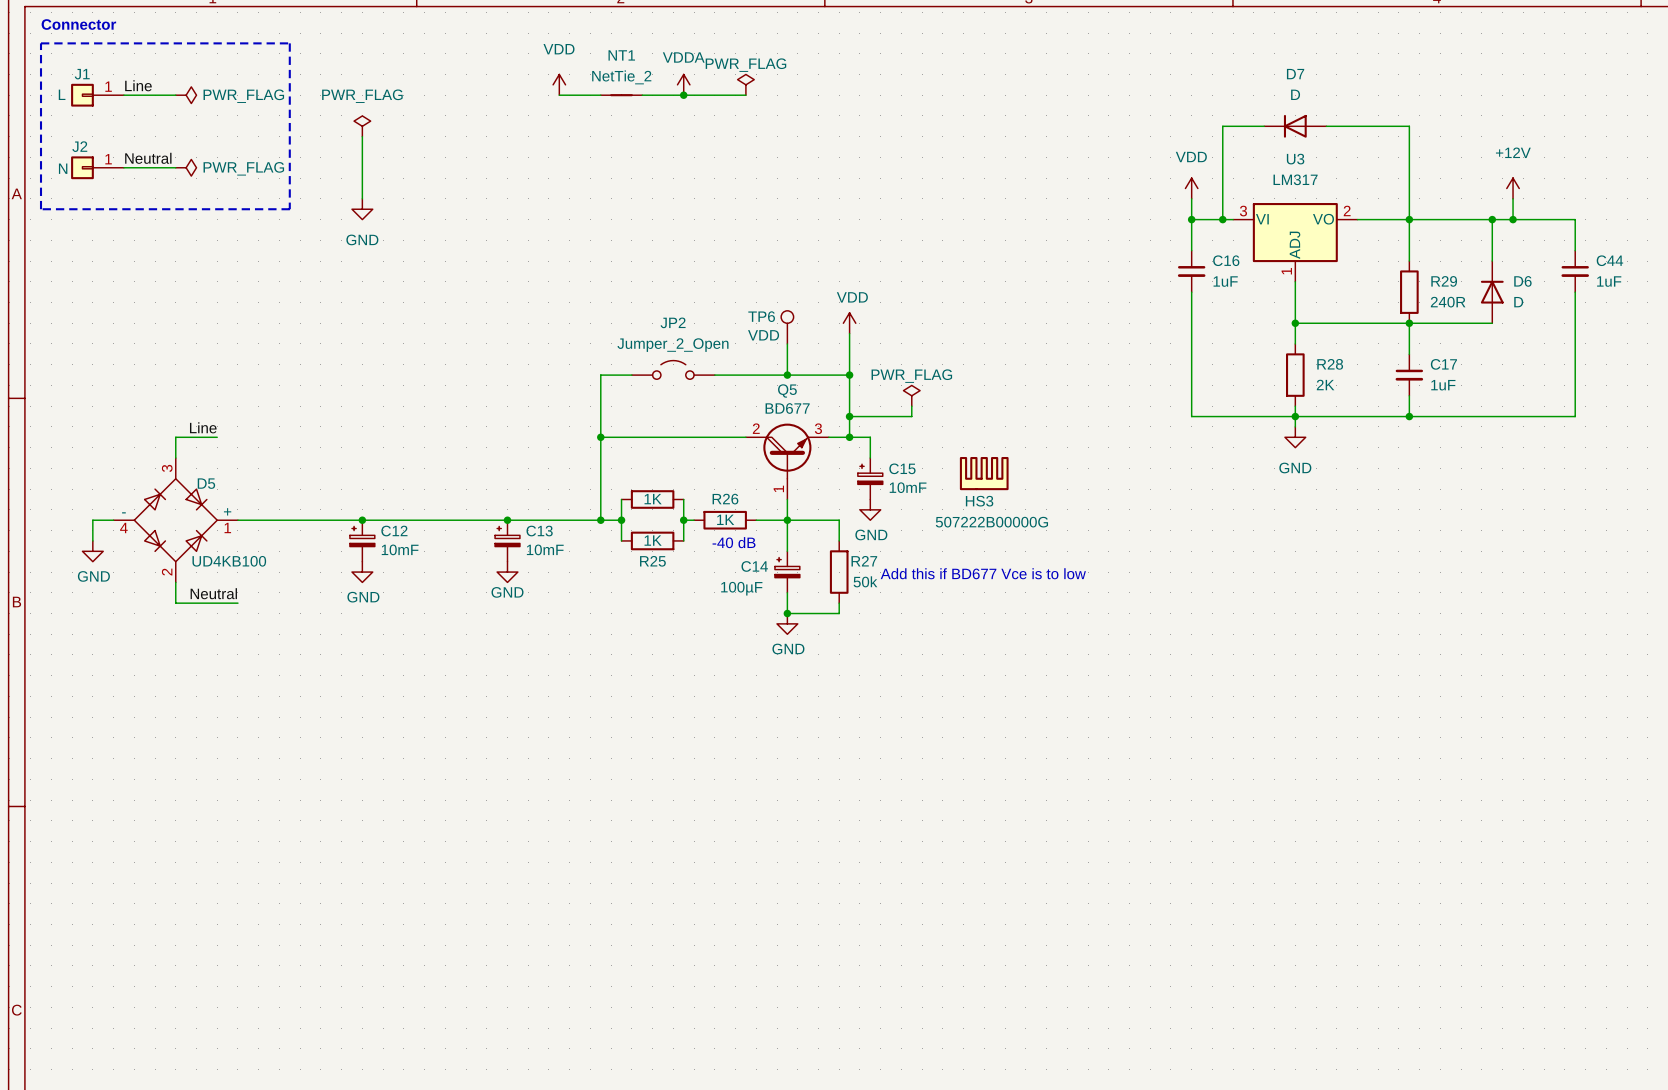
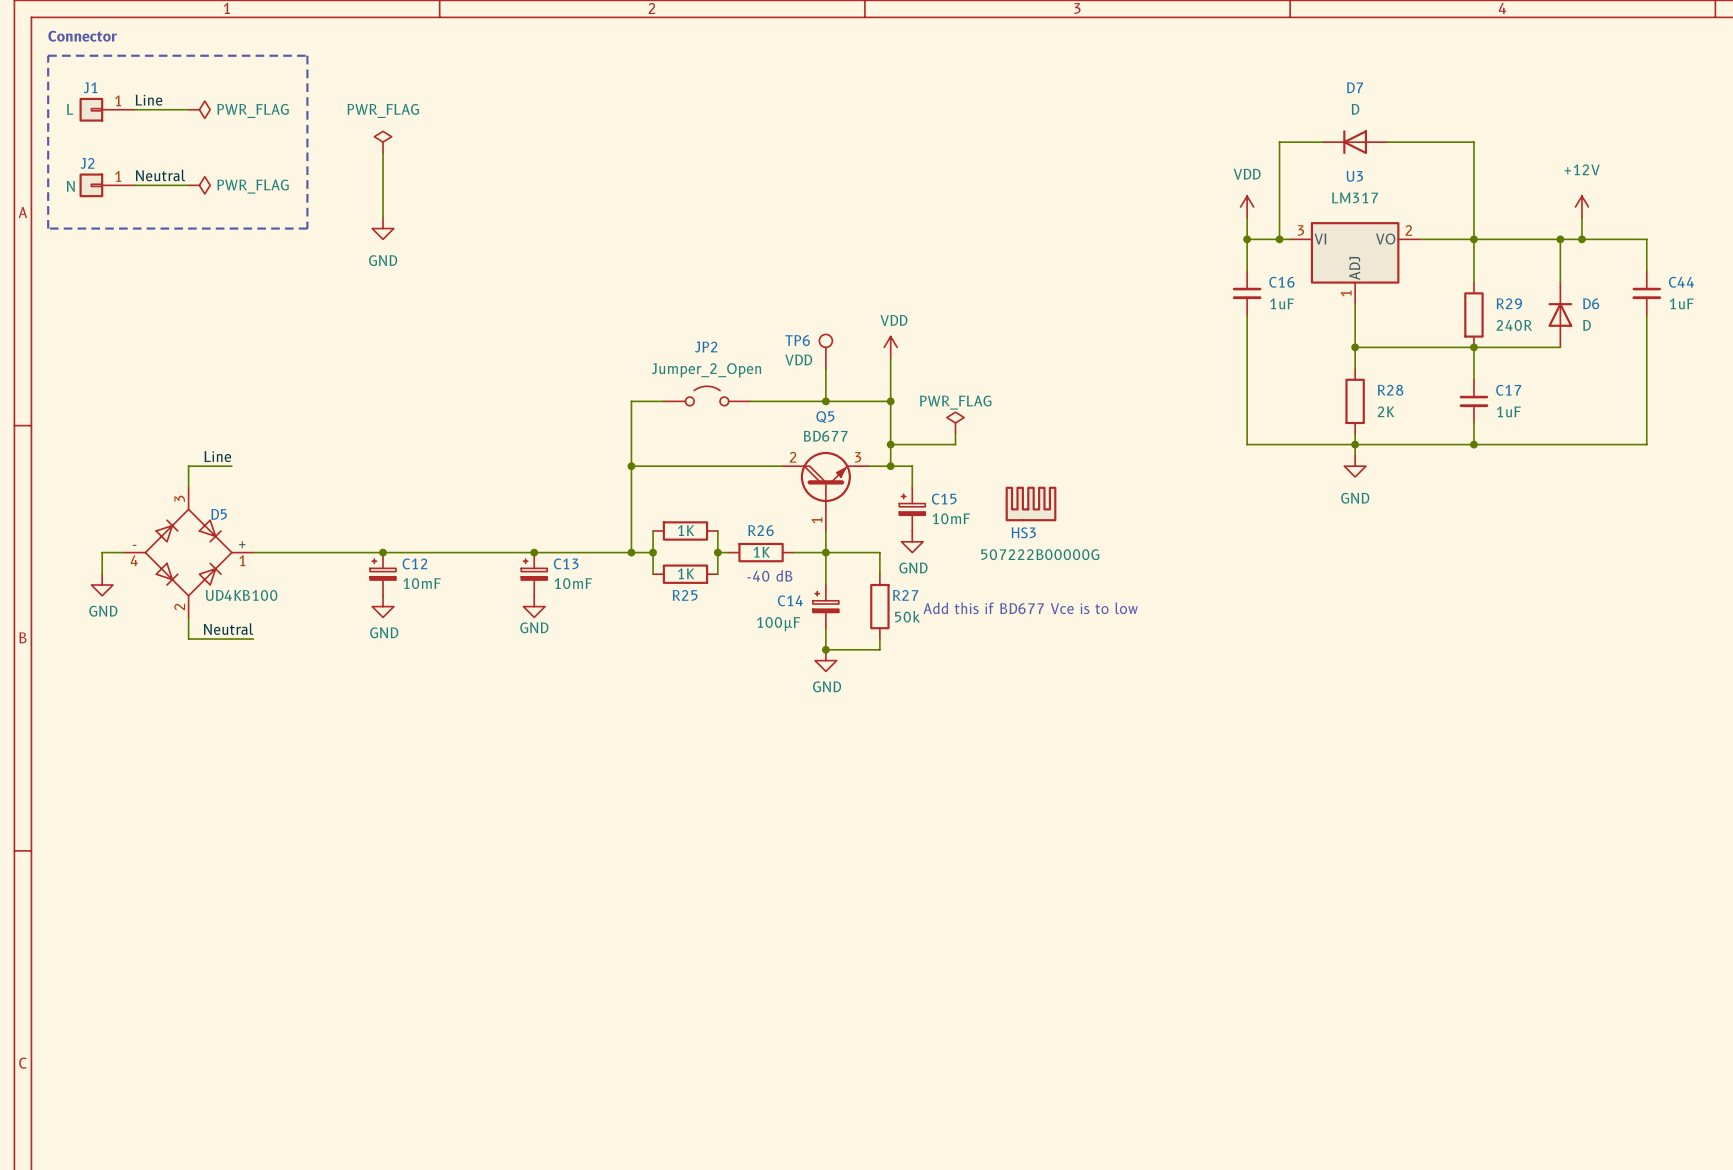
power symbol: VDD (559, 84) -> none
power symbol: VDDA (683, 84) -> none
power symbol: PWR_FLAG (745, 84) -> none
wire: (559, 95) (600, 95) -> none
NT1: NetTie_2 (621, 95) -> none
wire: (642, 95) (745, 95) -> none
junction: (683, 95) -> none

